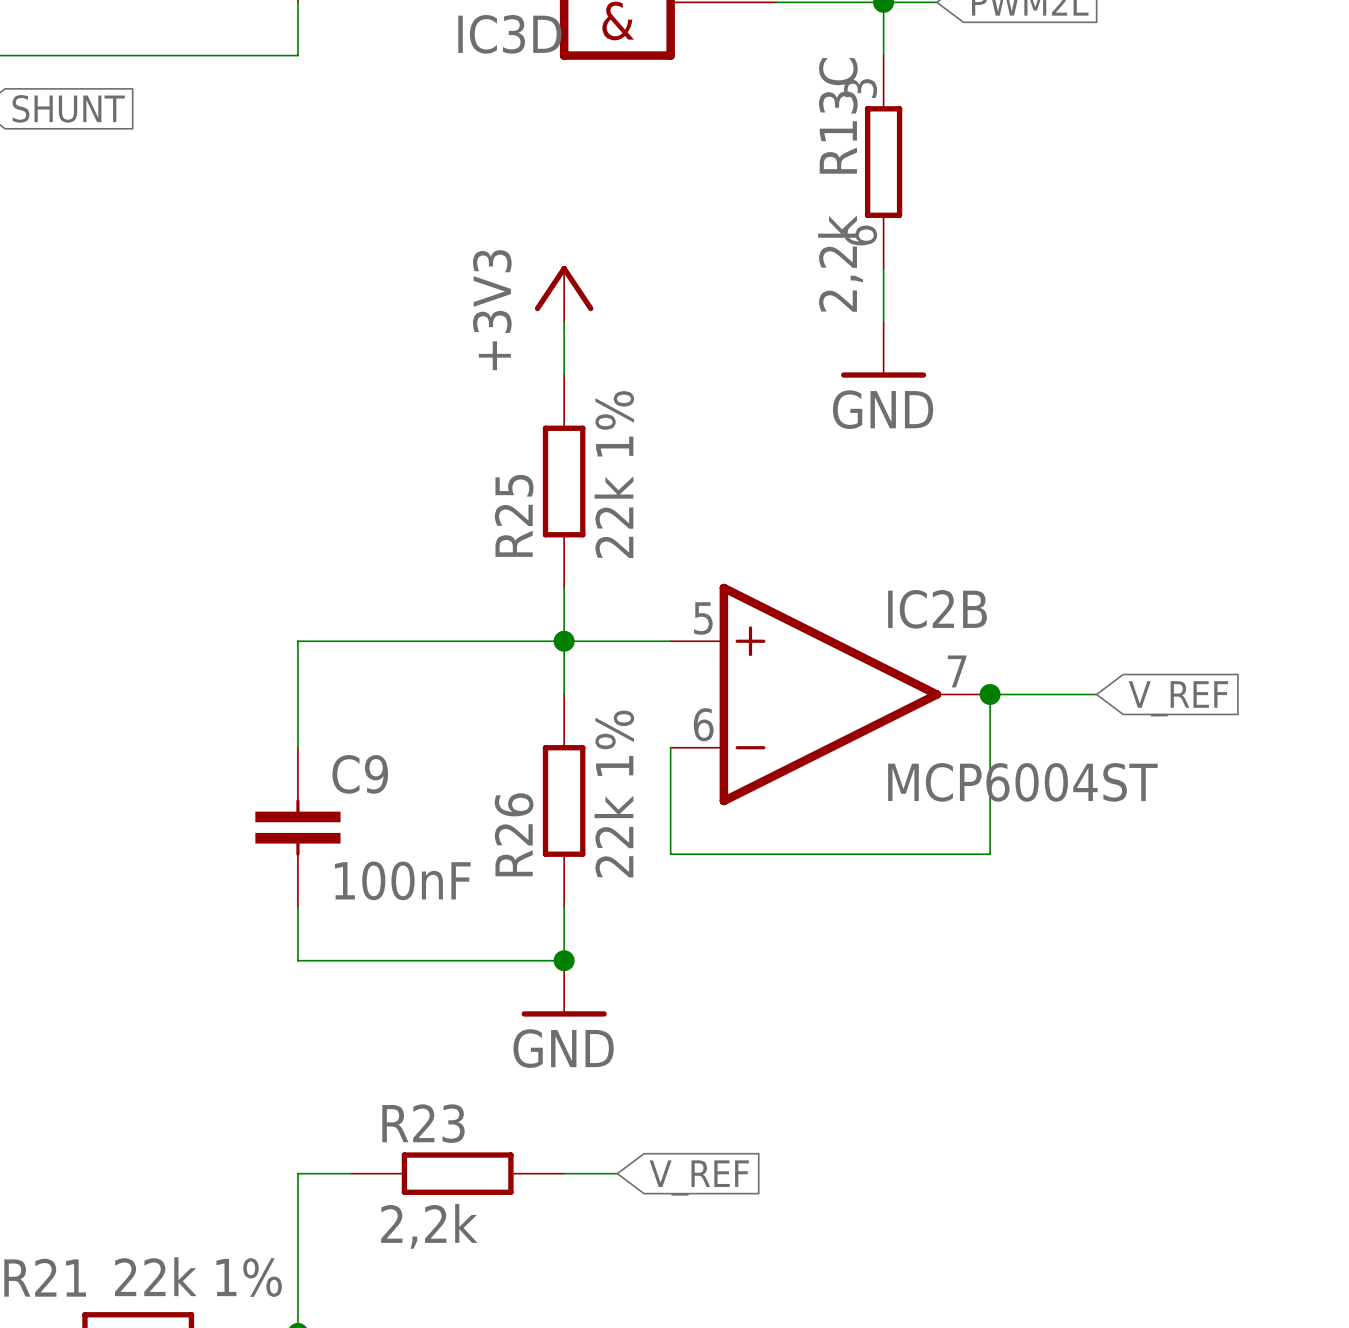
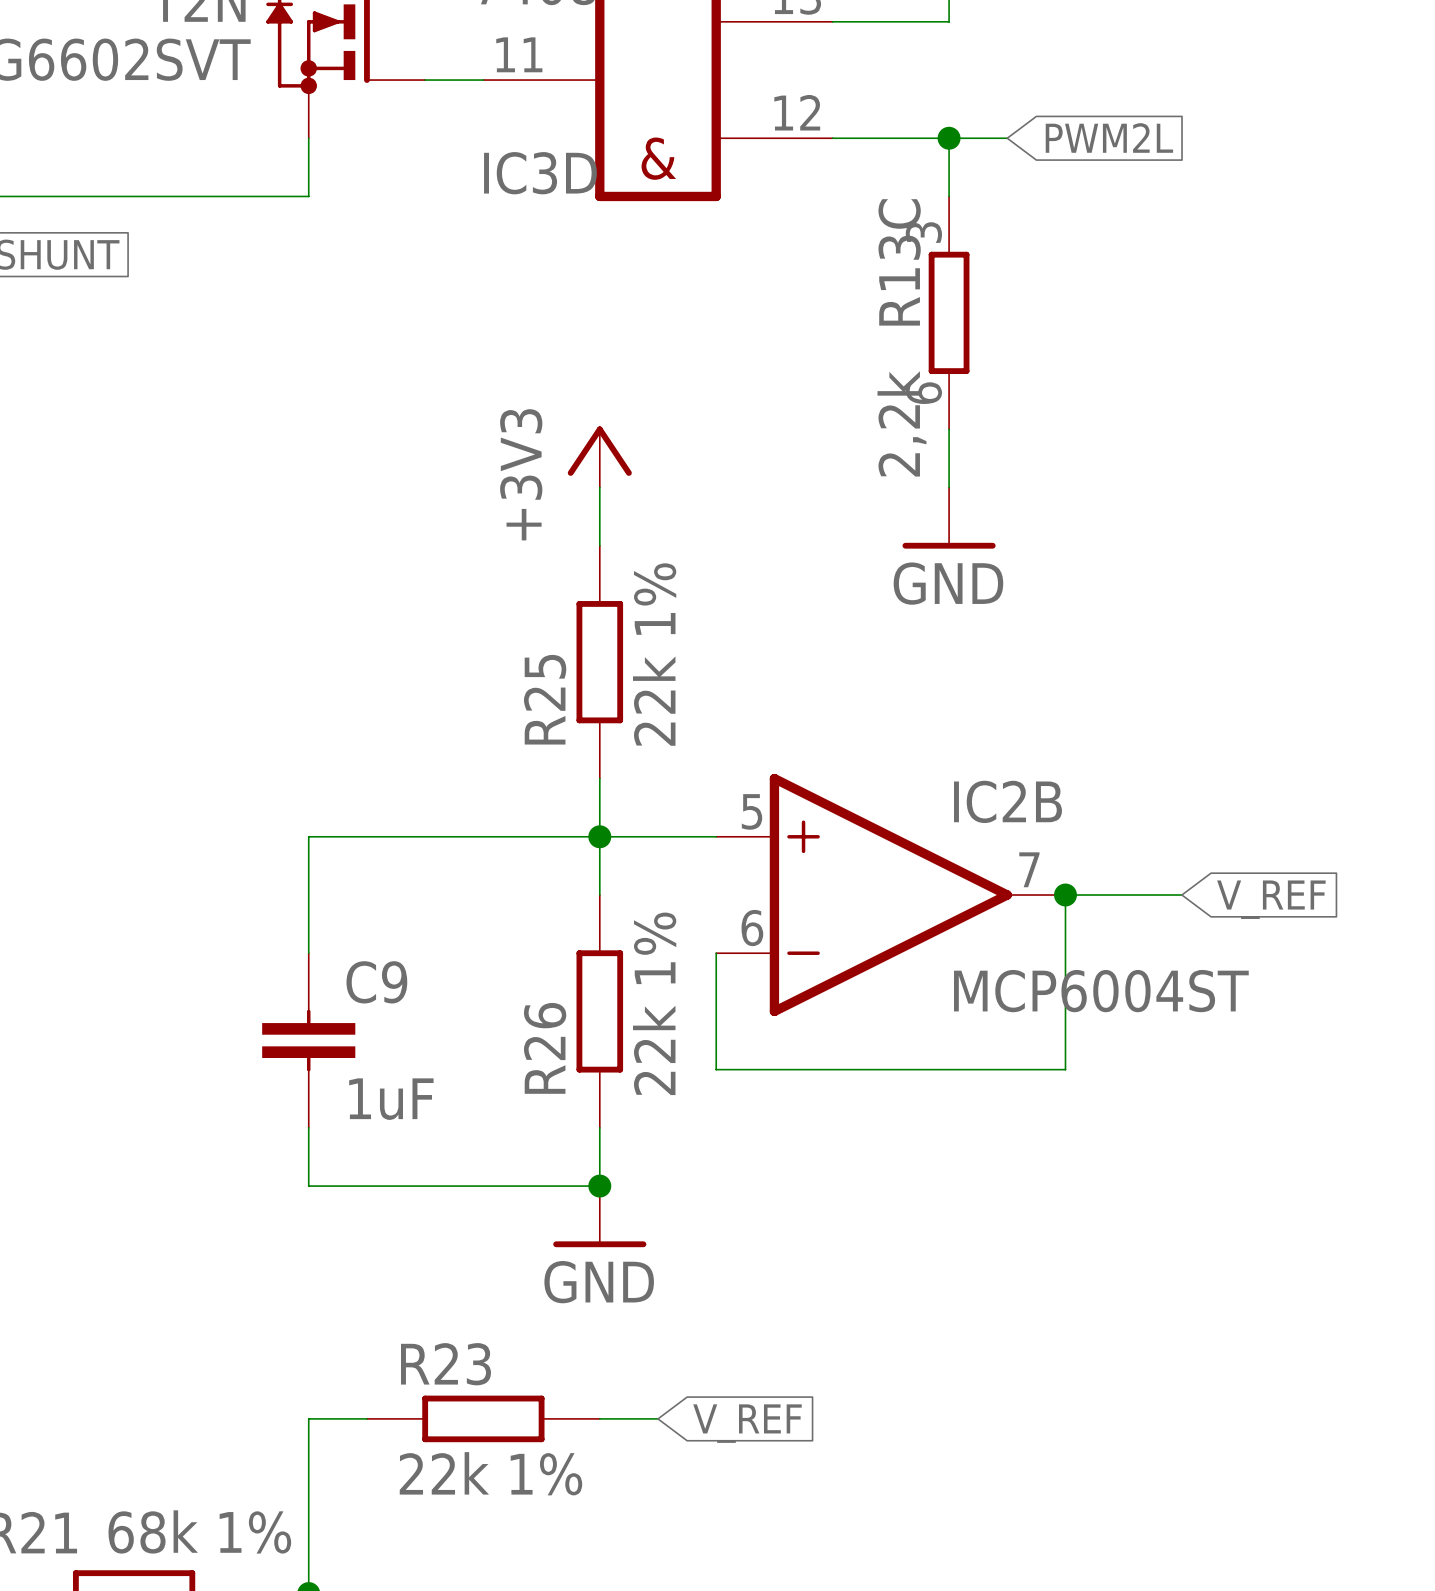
C9 value: 100nF (402, 880) -> 1uF (391, 1099)
R23 value: 2,2k (429, 1226) -> 22k 1% (490, 1473)
R21 value: 22k 1% (198, 1277) -> 68k 1% (199, 1531)

